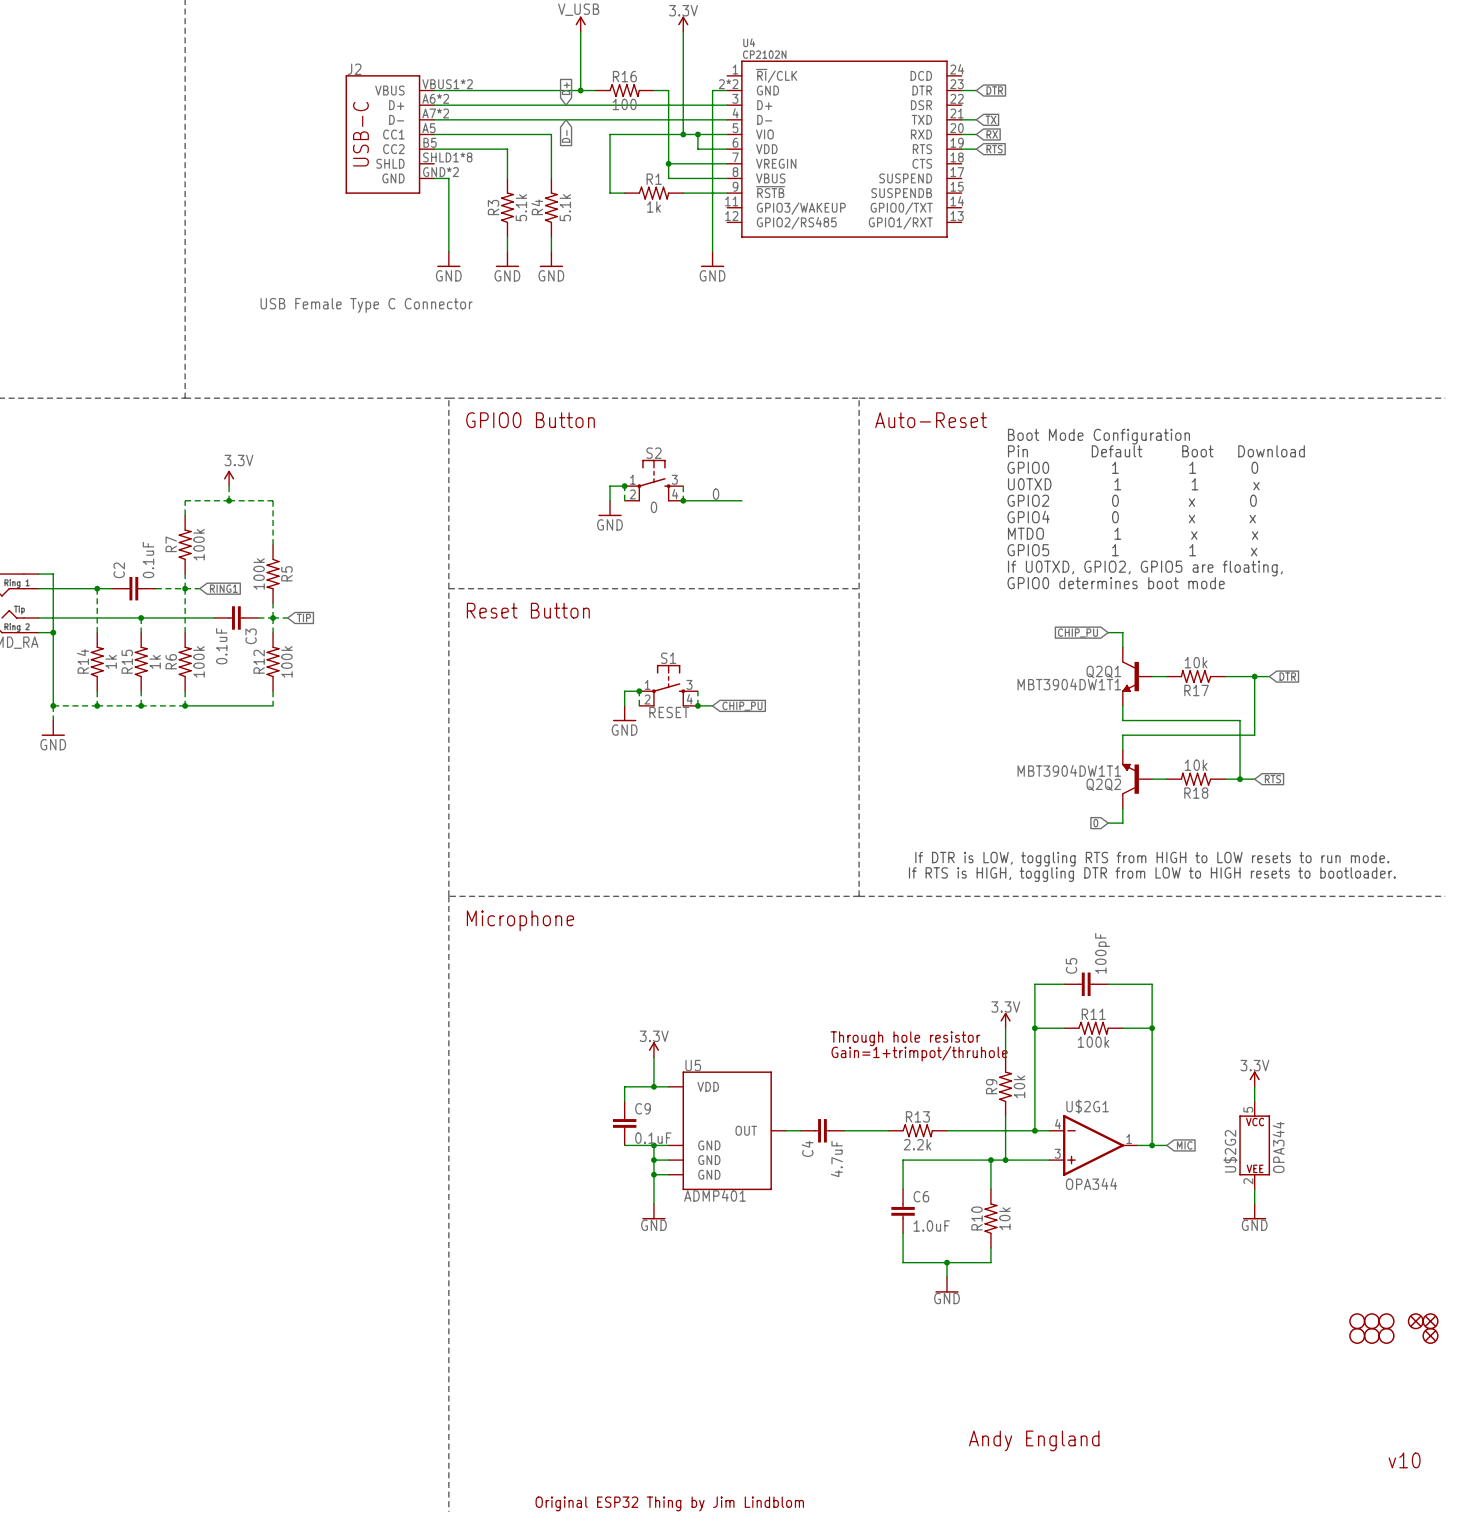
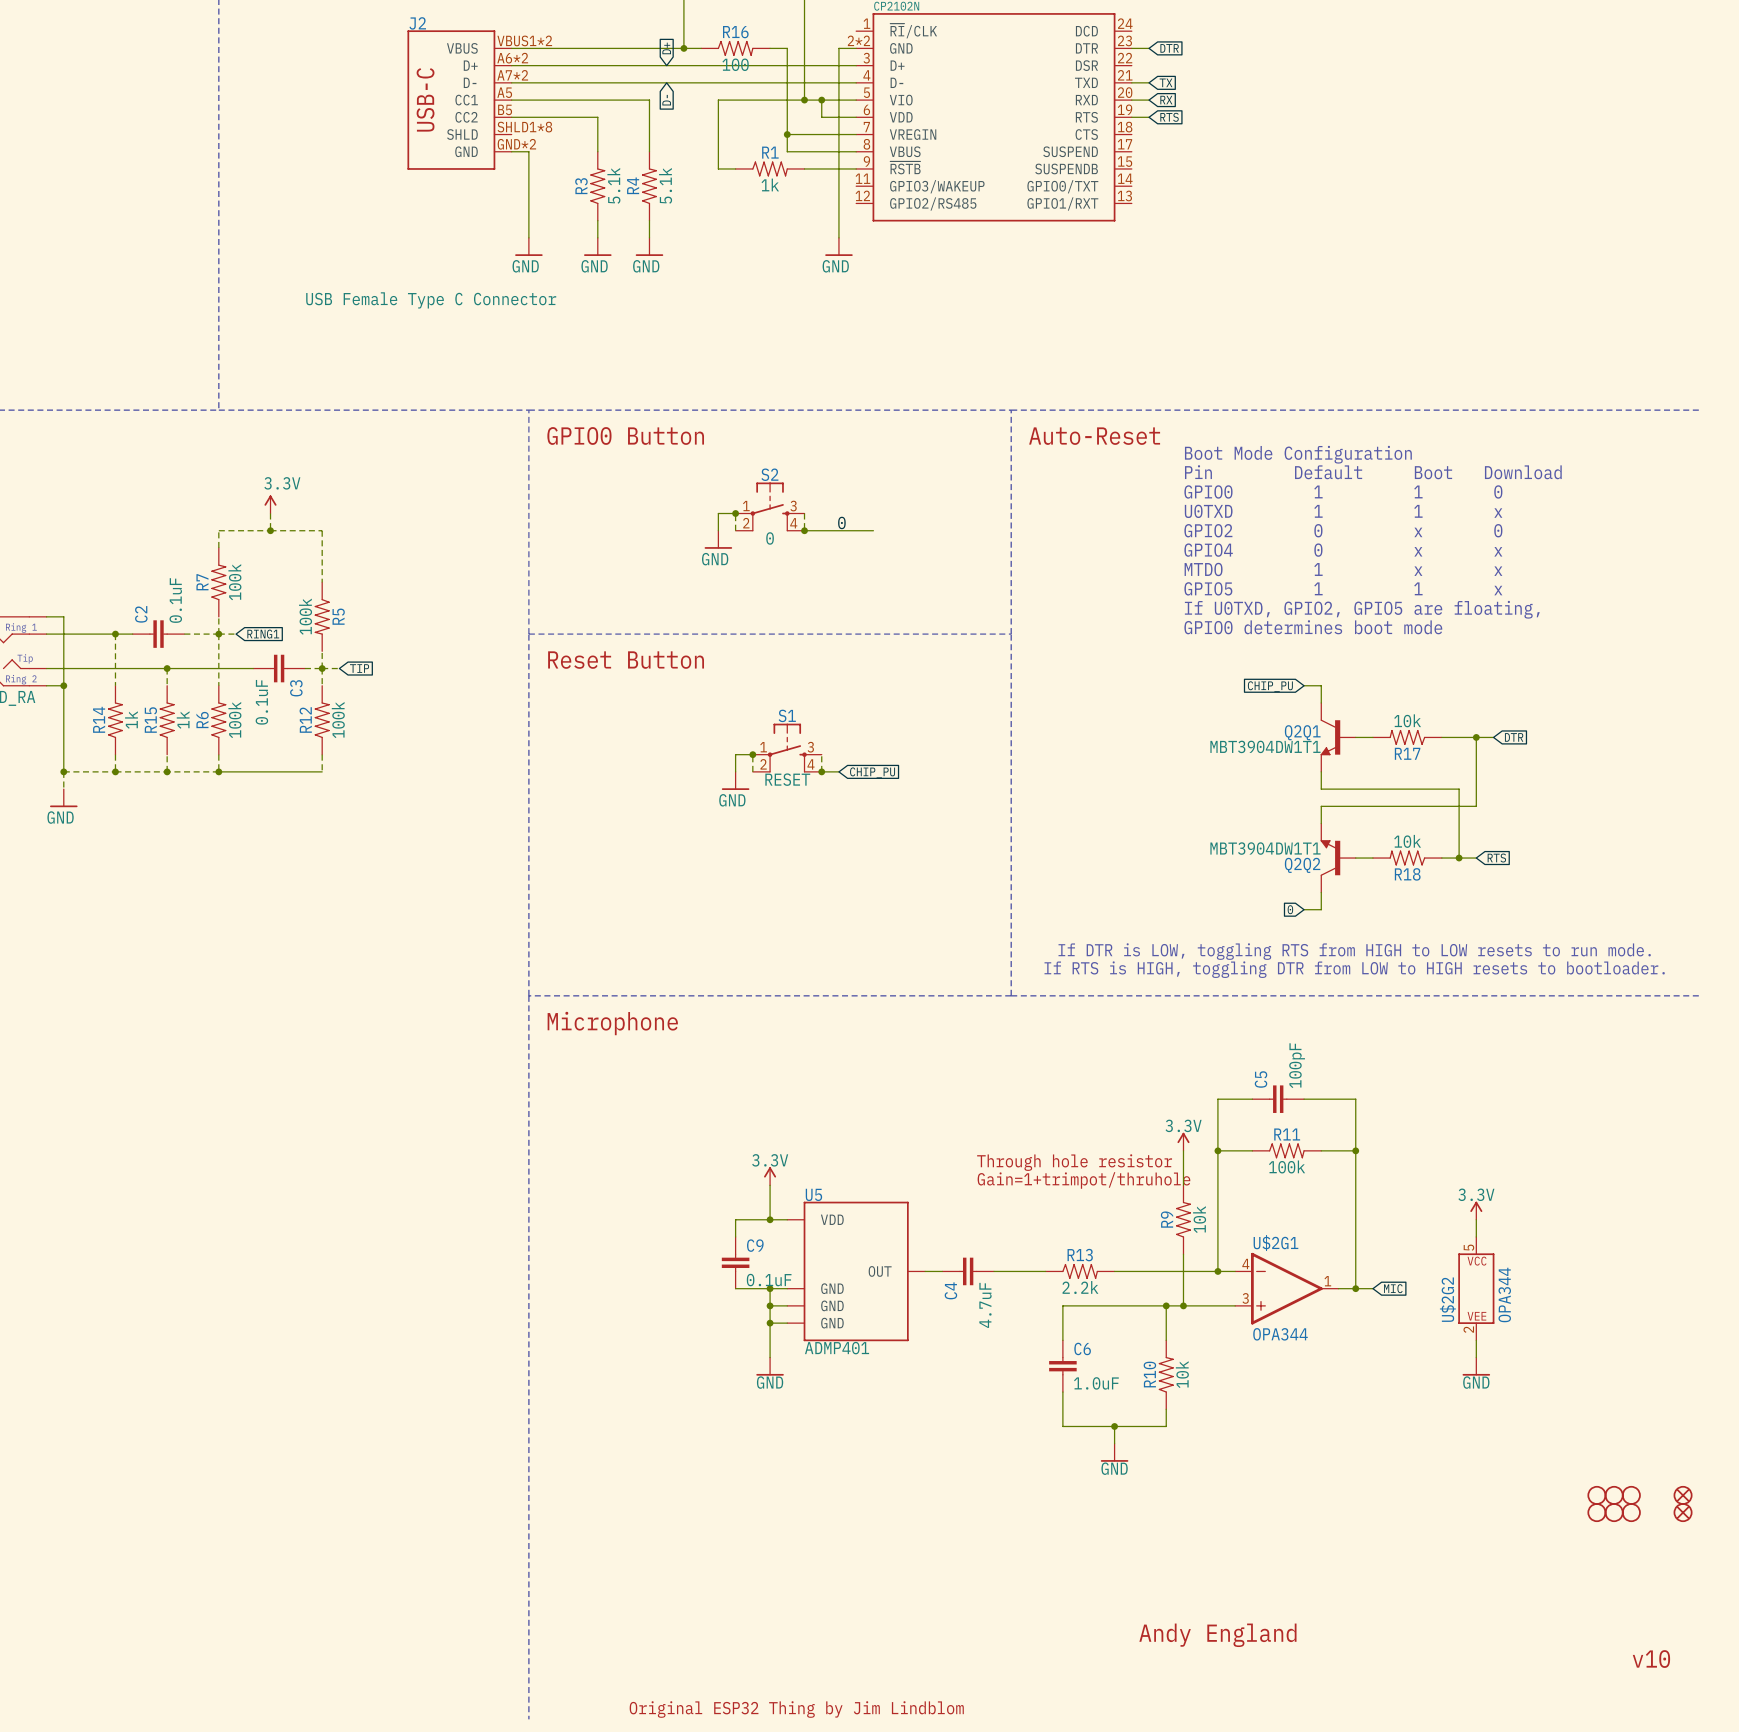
part: (1415, 1321) -> none

